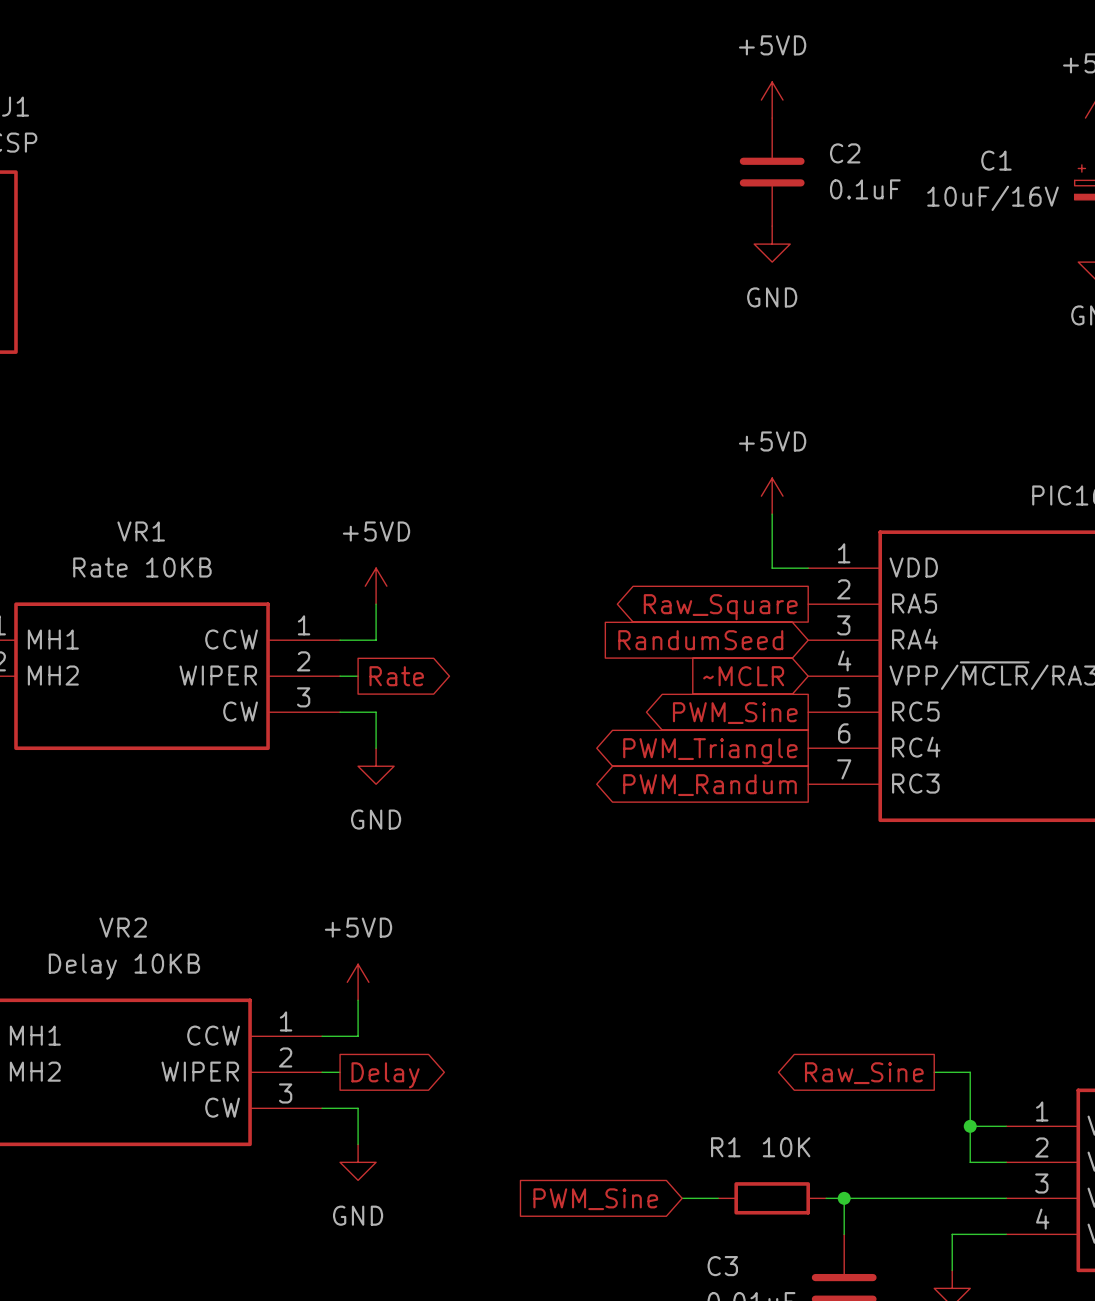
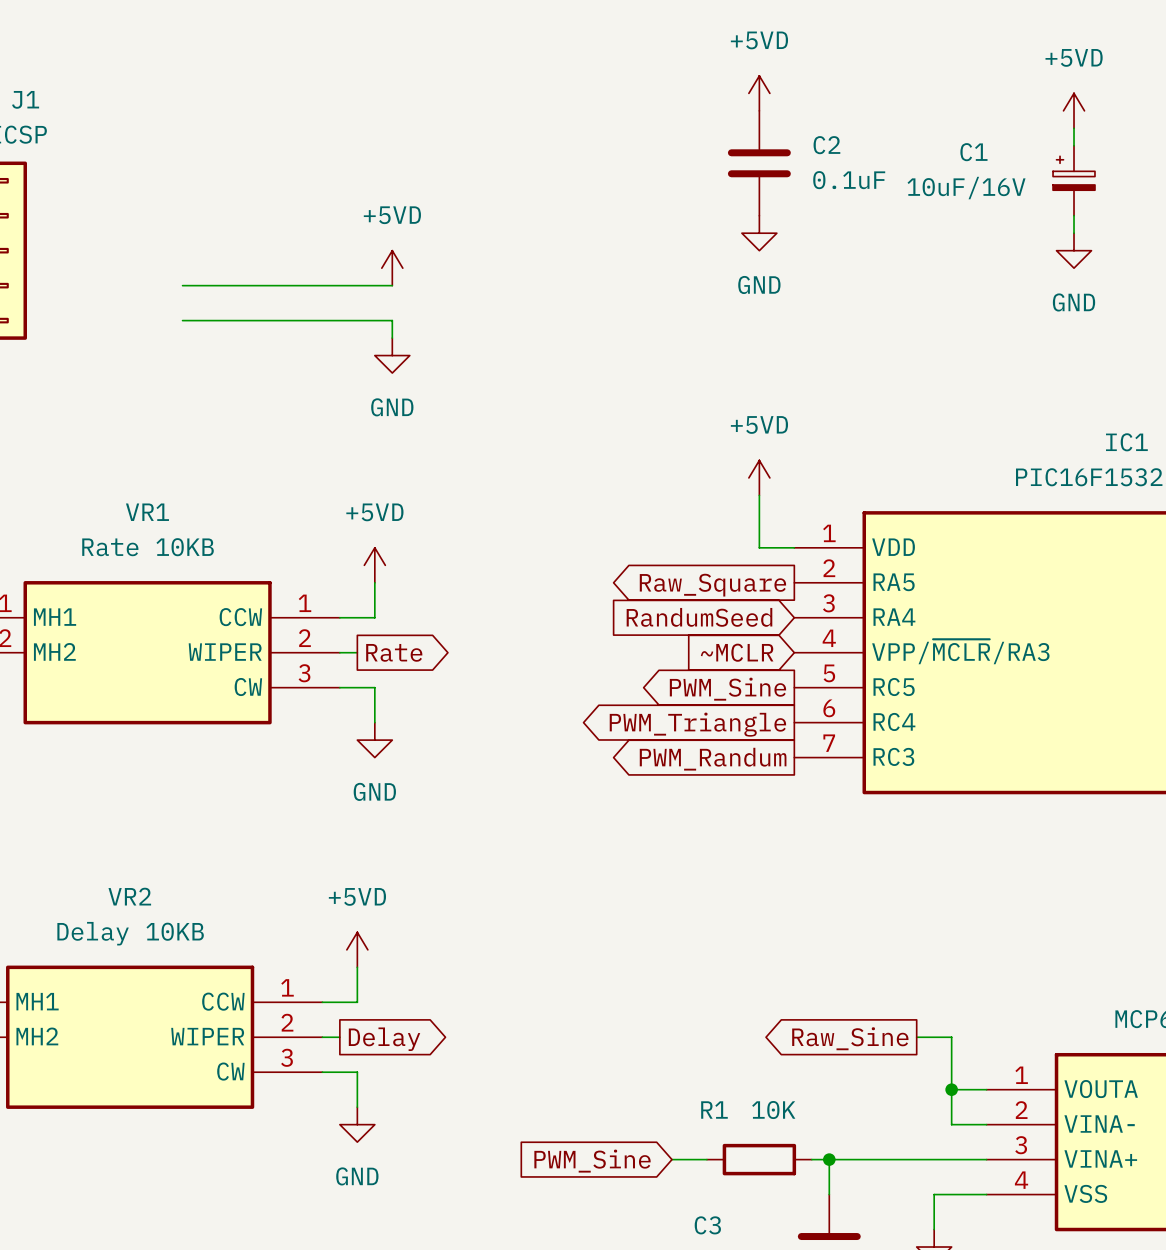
power symbol: none -> +5VD (392, 268)
wire: none -> (182, 285) (392, 285)
wire: none -> (182, 320) (392, 320) (392, 338)
power symbol: none -> GND (392, 355)

